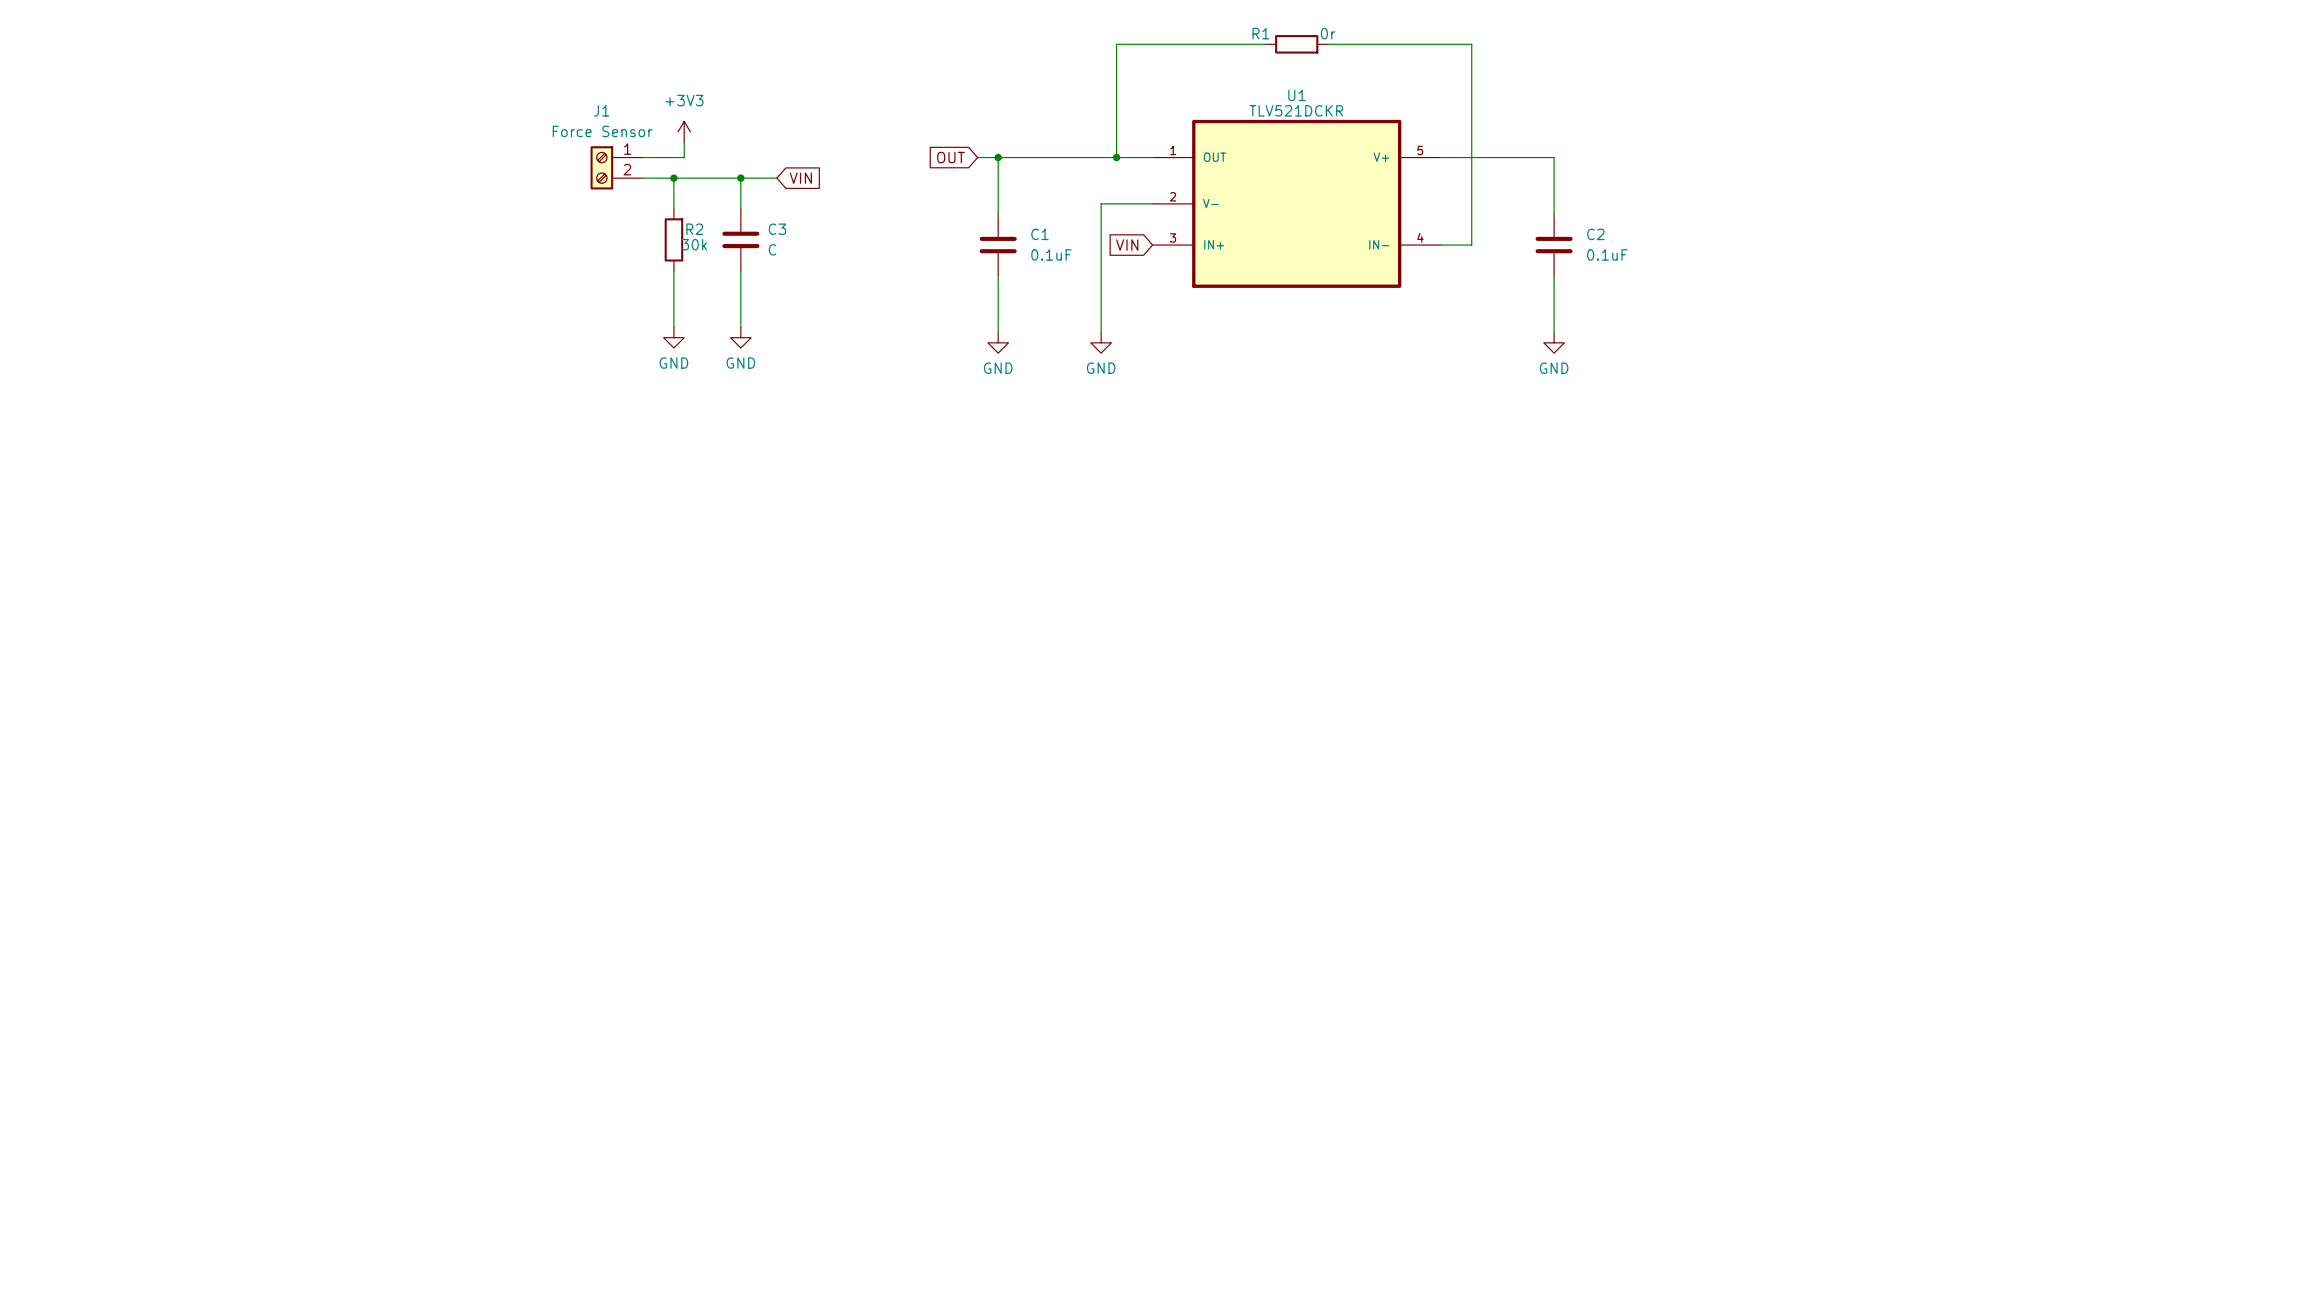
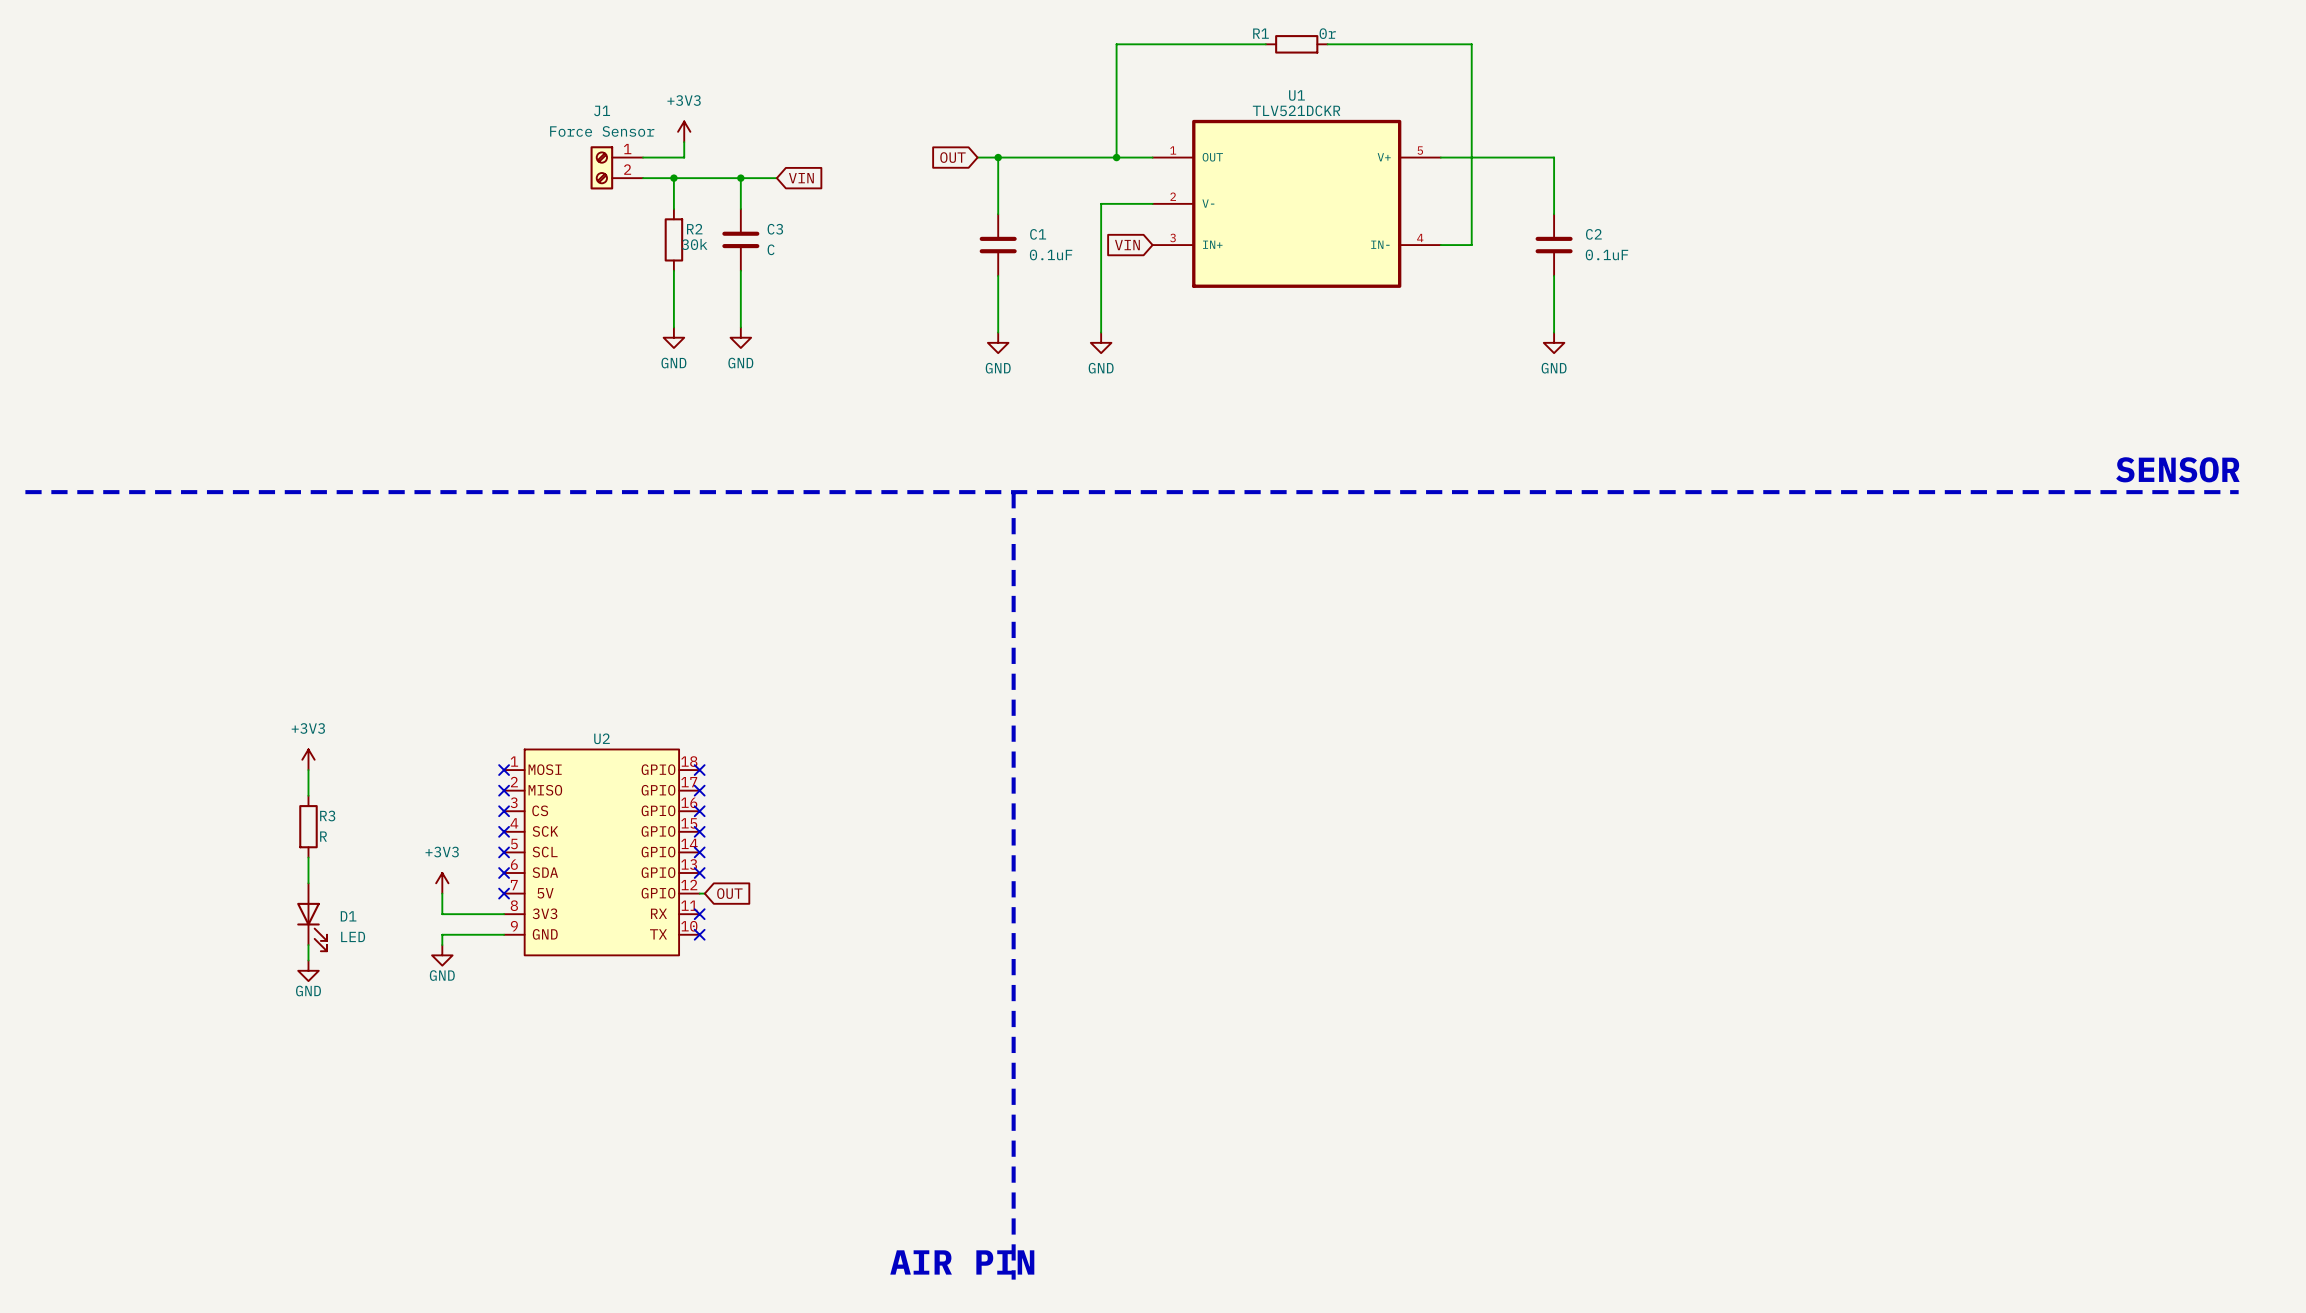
text: none -> SENSOR (2177, 469)
line: none -> (25, 492) (2238, 492)
line: none -> (1013, 492) (1013, 1279)
power symbol: none -> +3V3 (308, 759)
wire: none -> (308, 770) (308, 795)
no-connect mark: none -> (504, 770)
no-connect mark: none -> (699, 770)
no-connect mark: none -> (504, 790)
no-connect mark: none -> (699, 790)
no-connect mark: none -> (504, 811)
no-connect mark: none -> (699, 811)
R3: none -> R (308, 826)
no-connect mark: none -> (504, 831)
no-connect mark: none -> (699, 831)
no-connect mark: none -> (504, 852)
U2: none -> (601, 852)
no-connect mark: none -> (699, 852)
wire: none -> (308, 857) (308, 883)
no-connect mark: none -> (504, 873)
no-connect mark: none -> (699, 873)
power symbol: none -> +3V3 (442, 883)
wire: none -> (442, 893) (442, 914) (504, 914)
no-connect mark: none -> (504, 893)
wire: none -> (699, 893) (704, 893)
global label: none -> OUT (729, 893)
no-connect mark: none -> (699, 914)
D1: none -> LED (312, 917)
wire: none -> (504, 934) (442, 934) (442, 945)
no-connect mark: none -> (699, 934)
wire: none -> (308, 945) (308, 960)
power symbol: none -> GND (442, 955)
power symbol: none -> GND (308, 970)
text: none -> AIR PIN (962, 1262)

